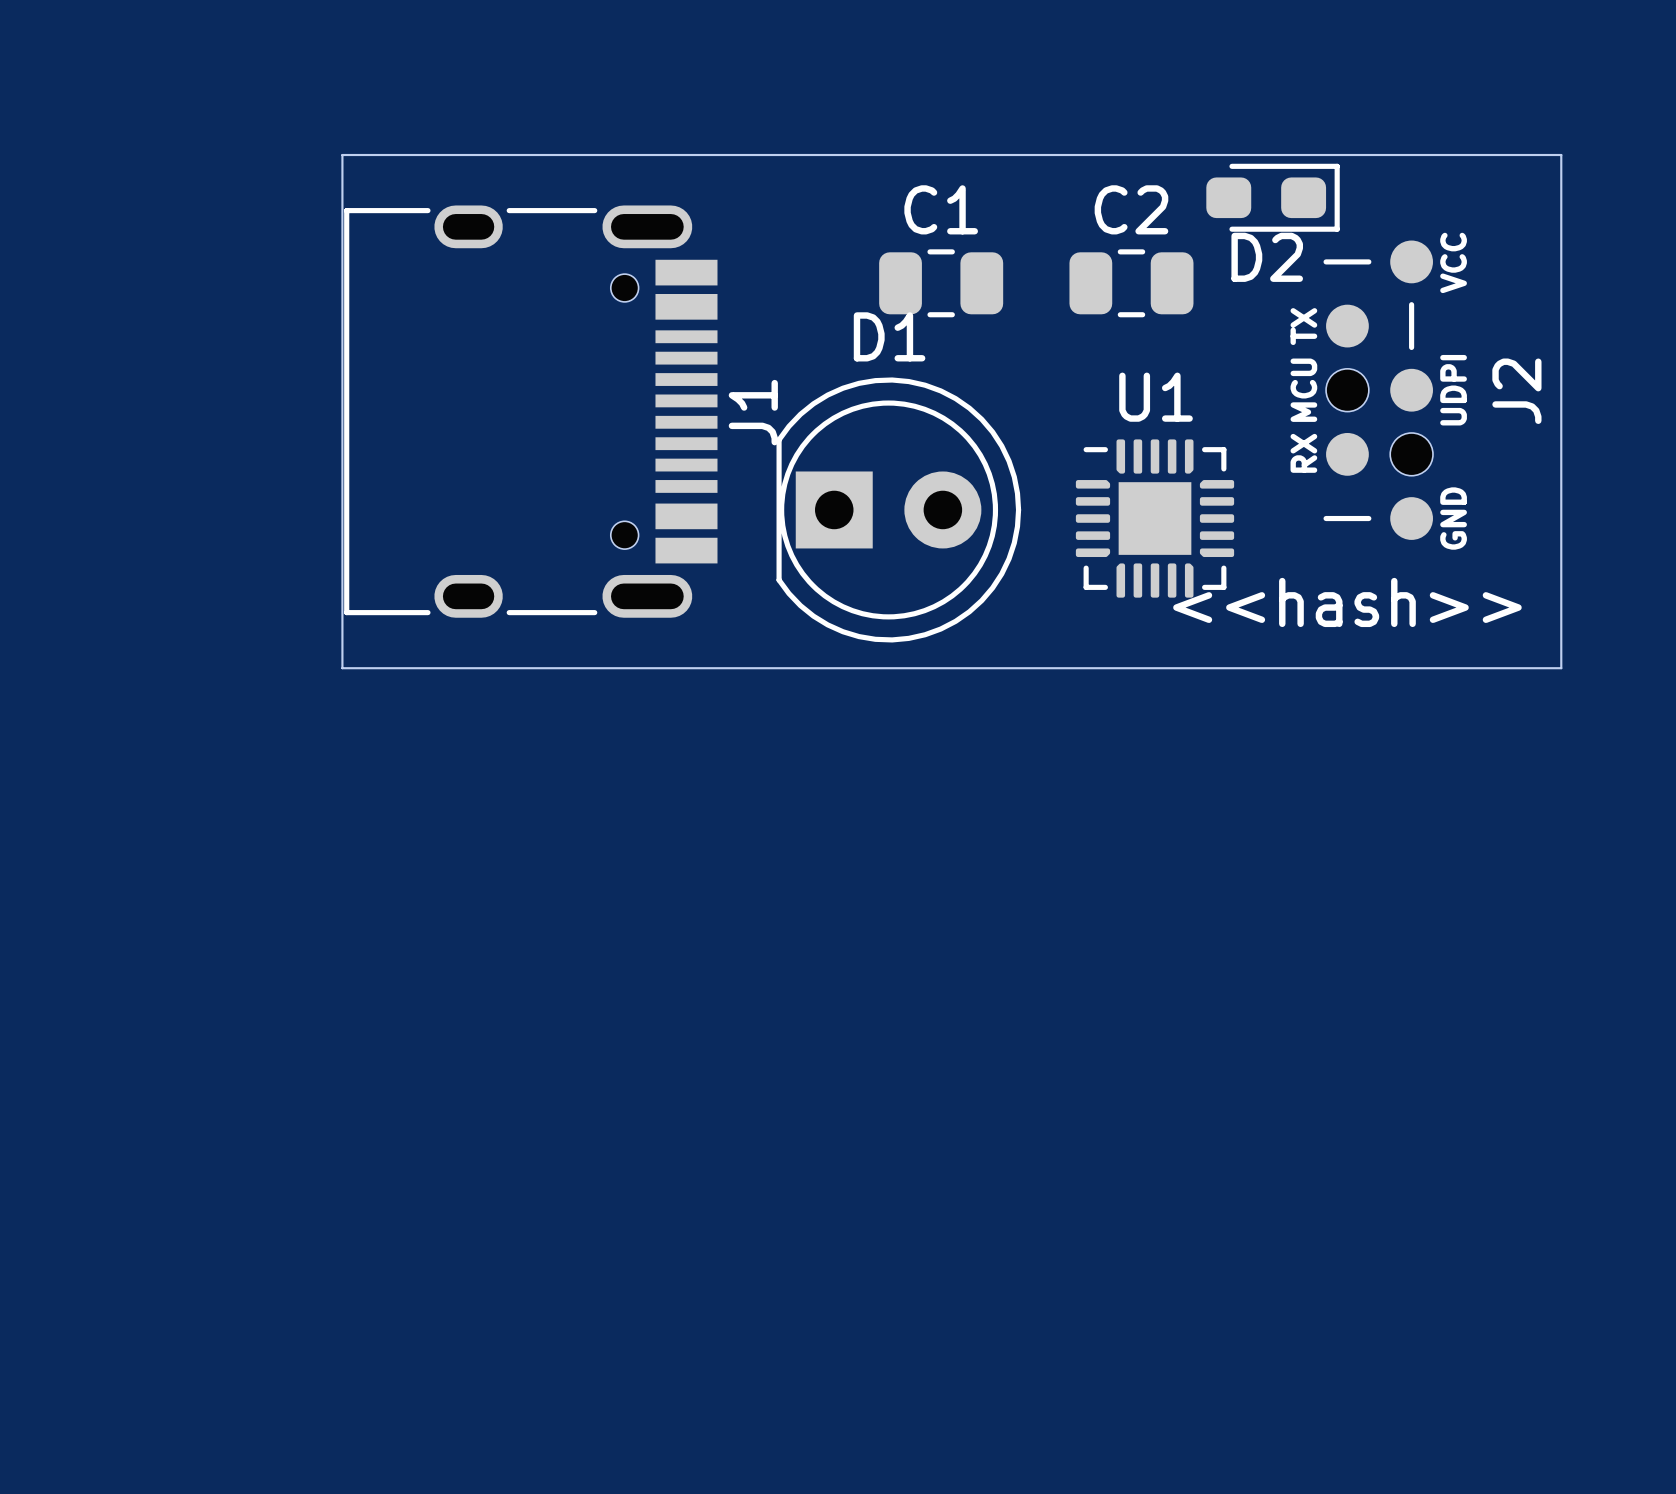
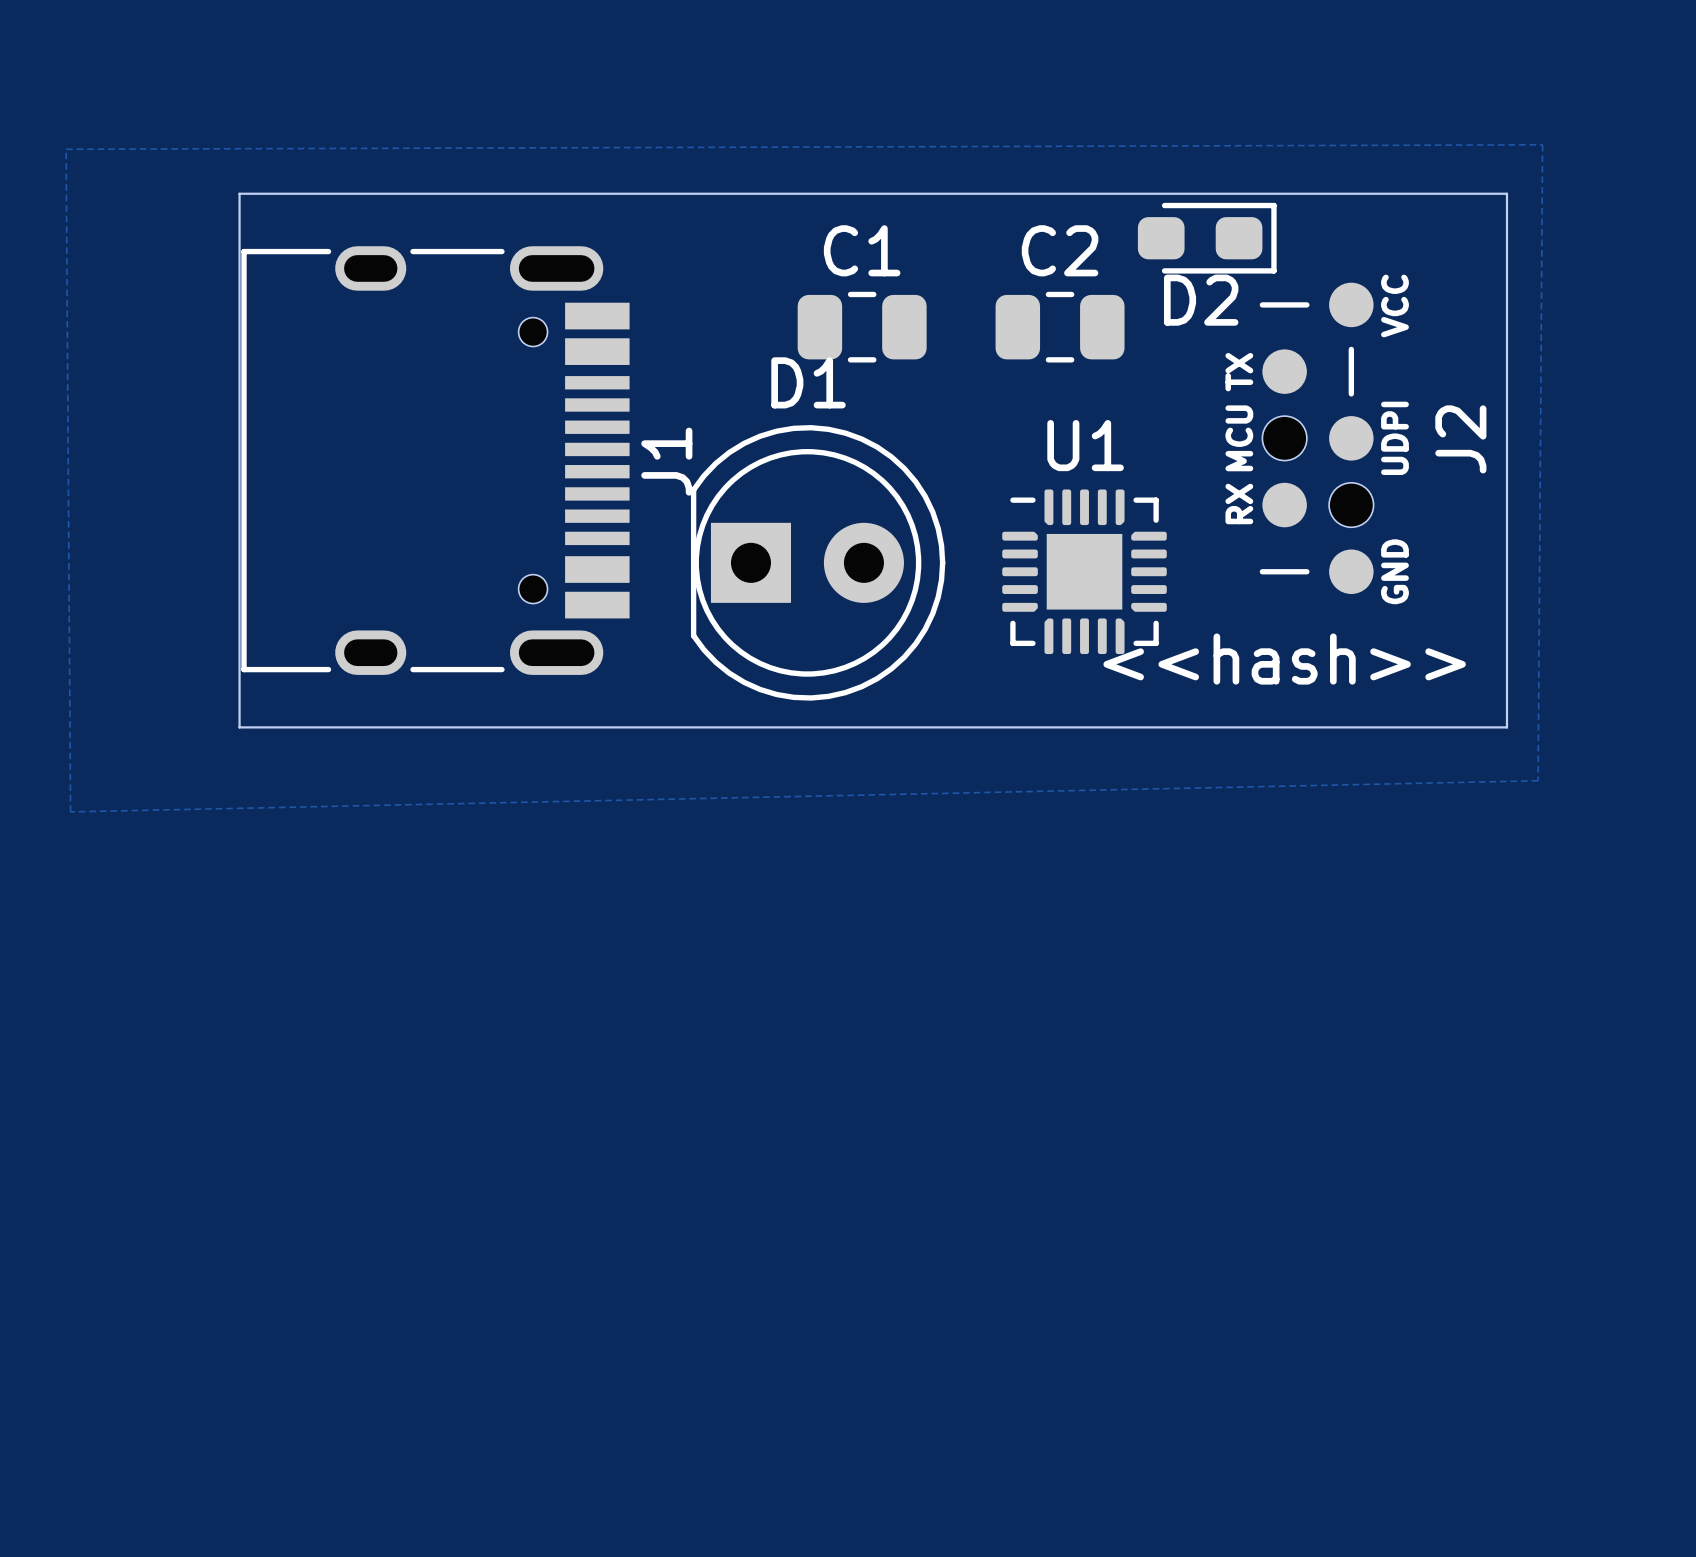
zone outline: none -> (1542, 144) (66, 149) (70, 811) (1538, 780) (1542, 144)

